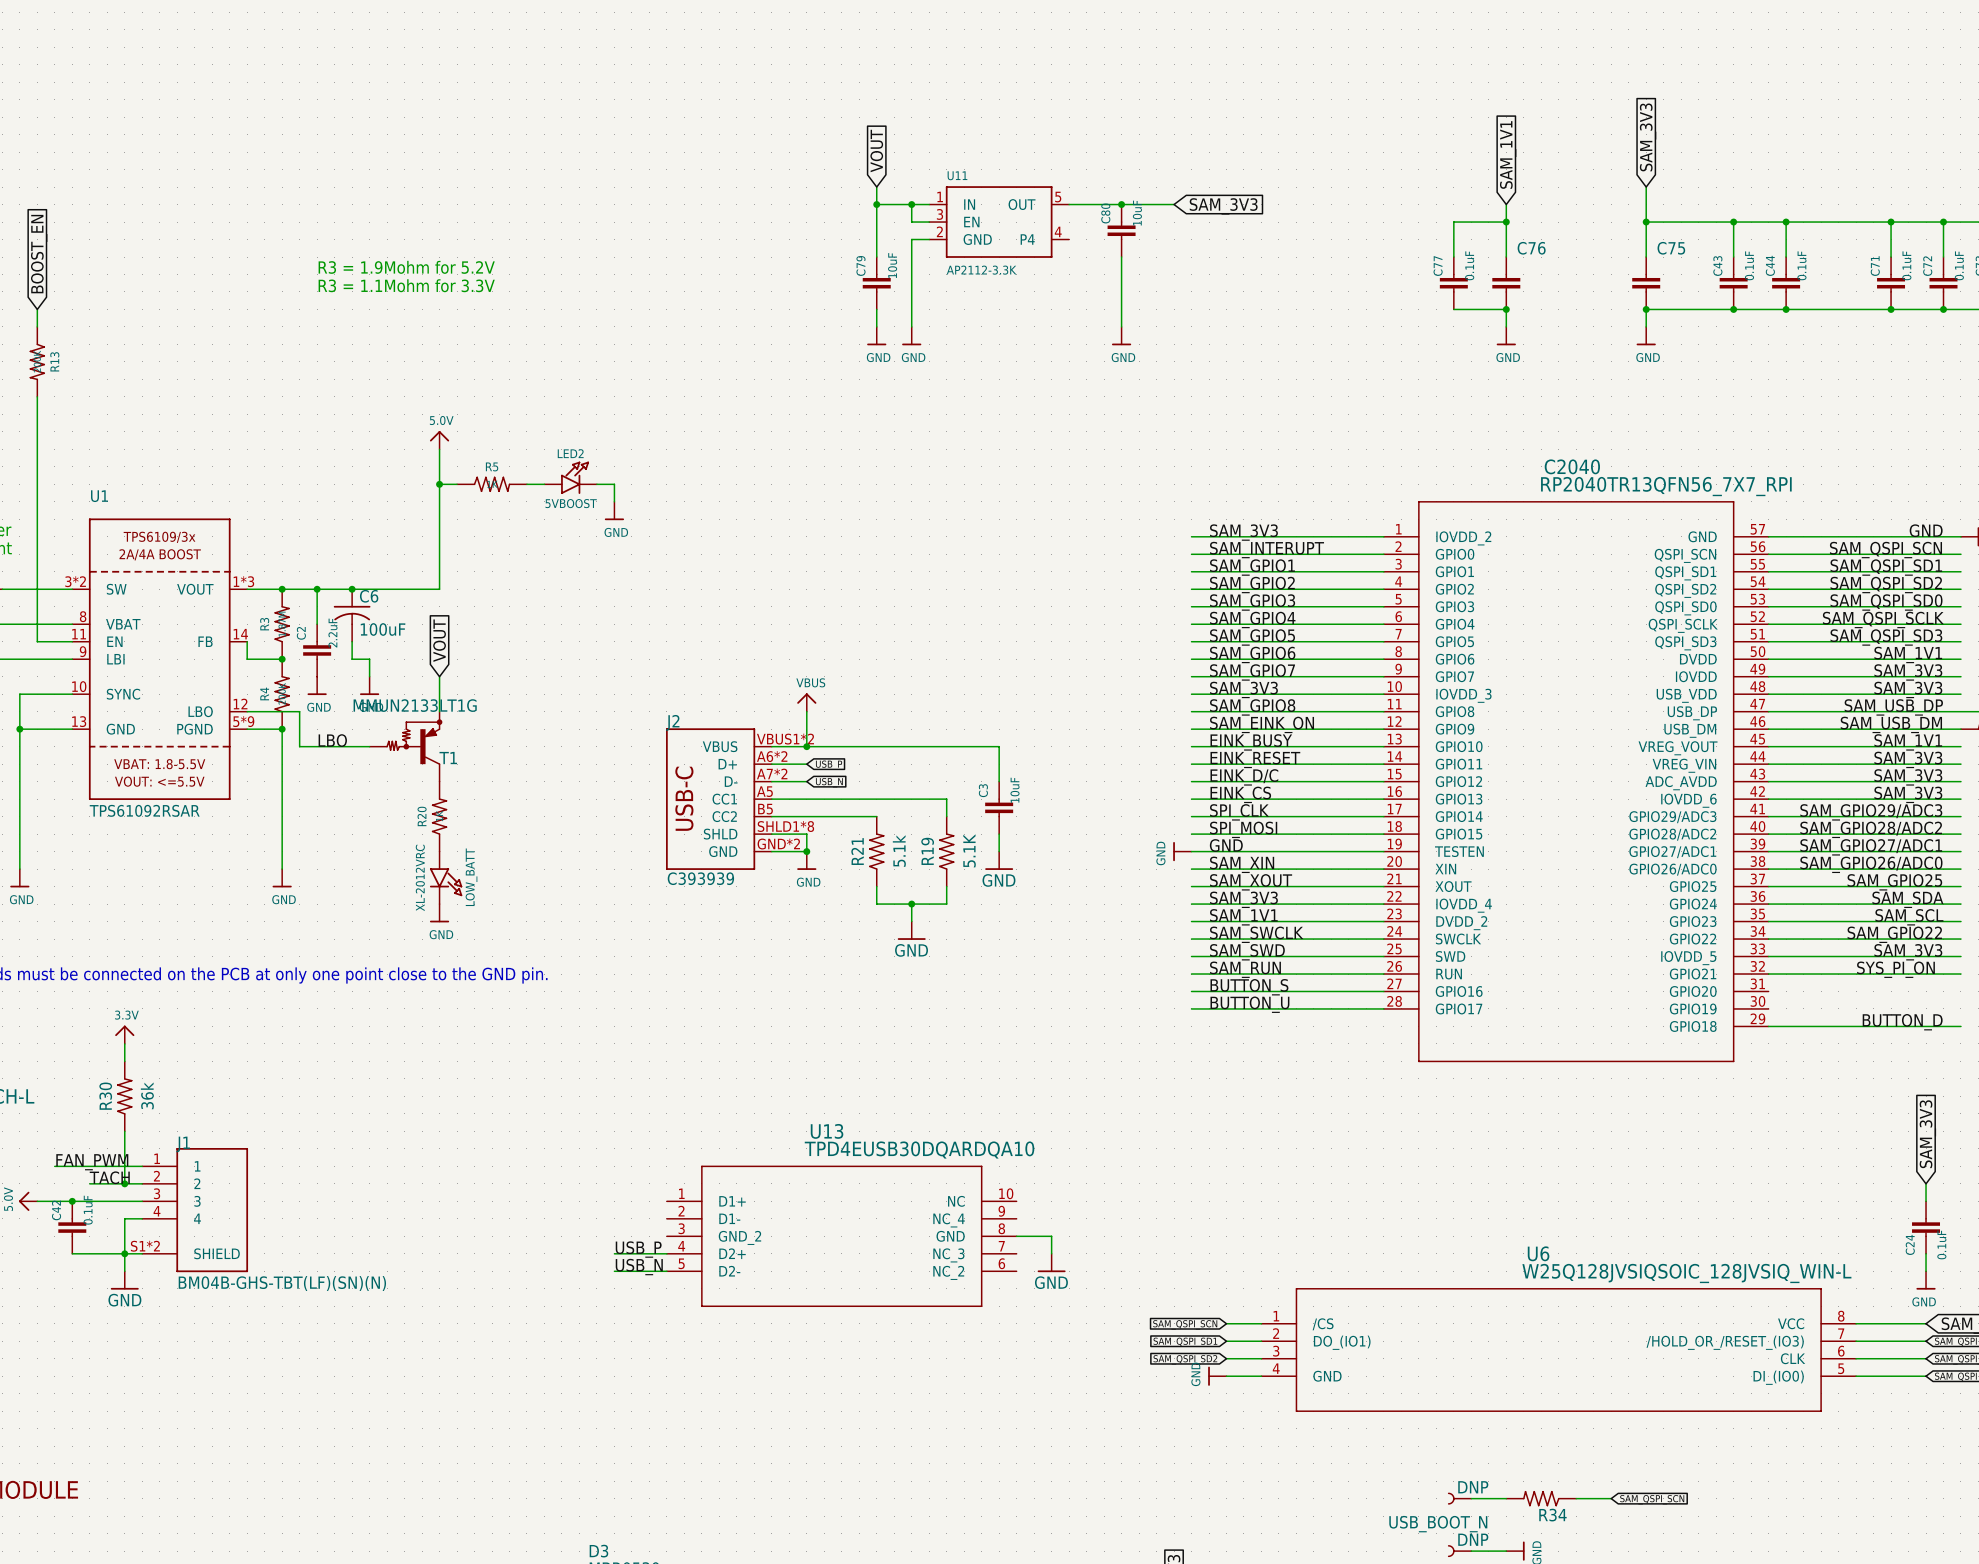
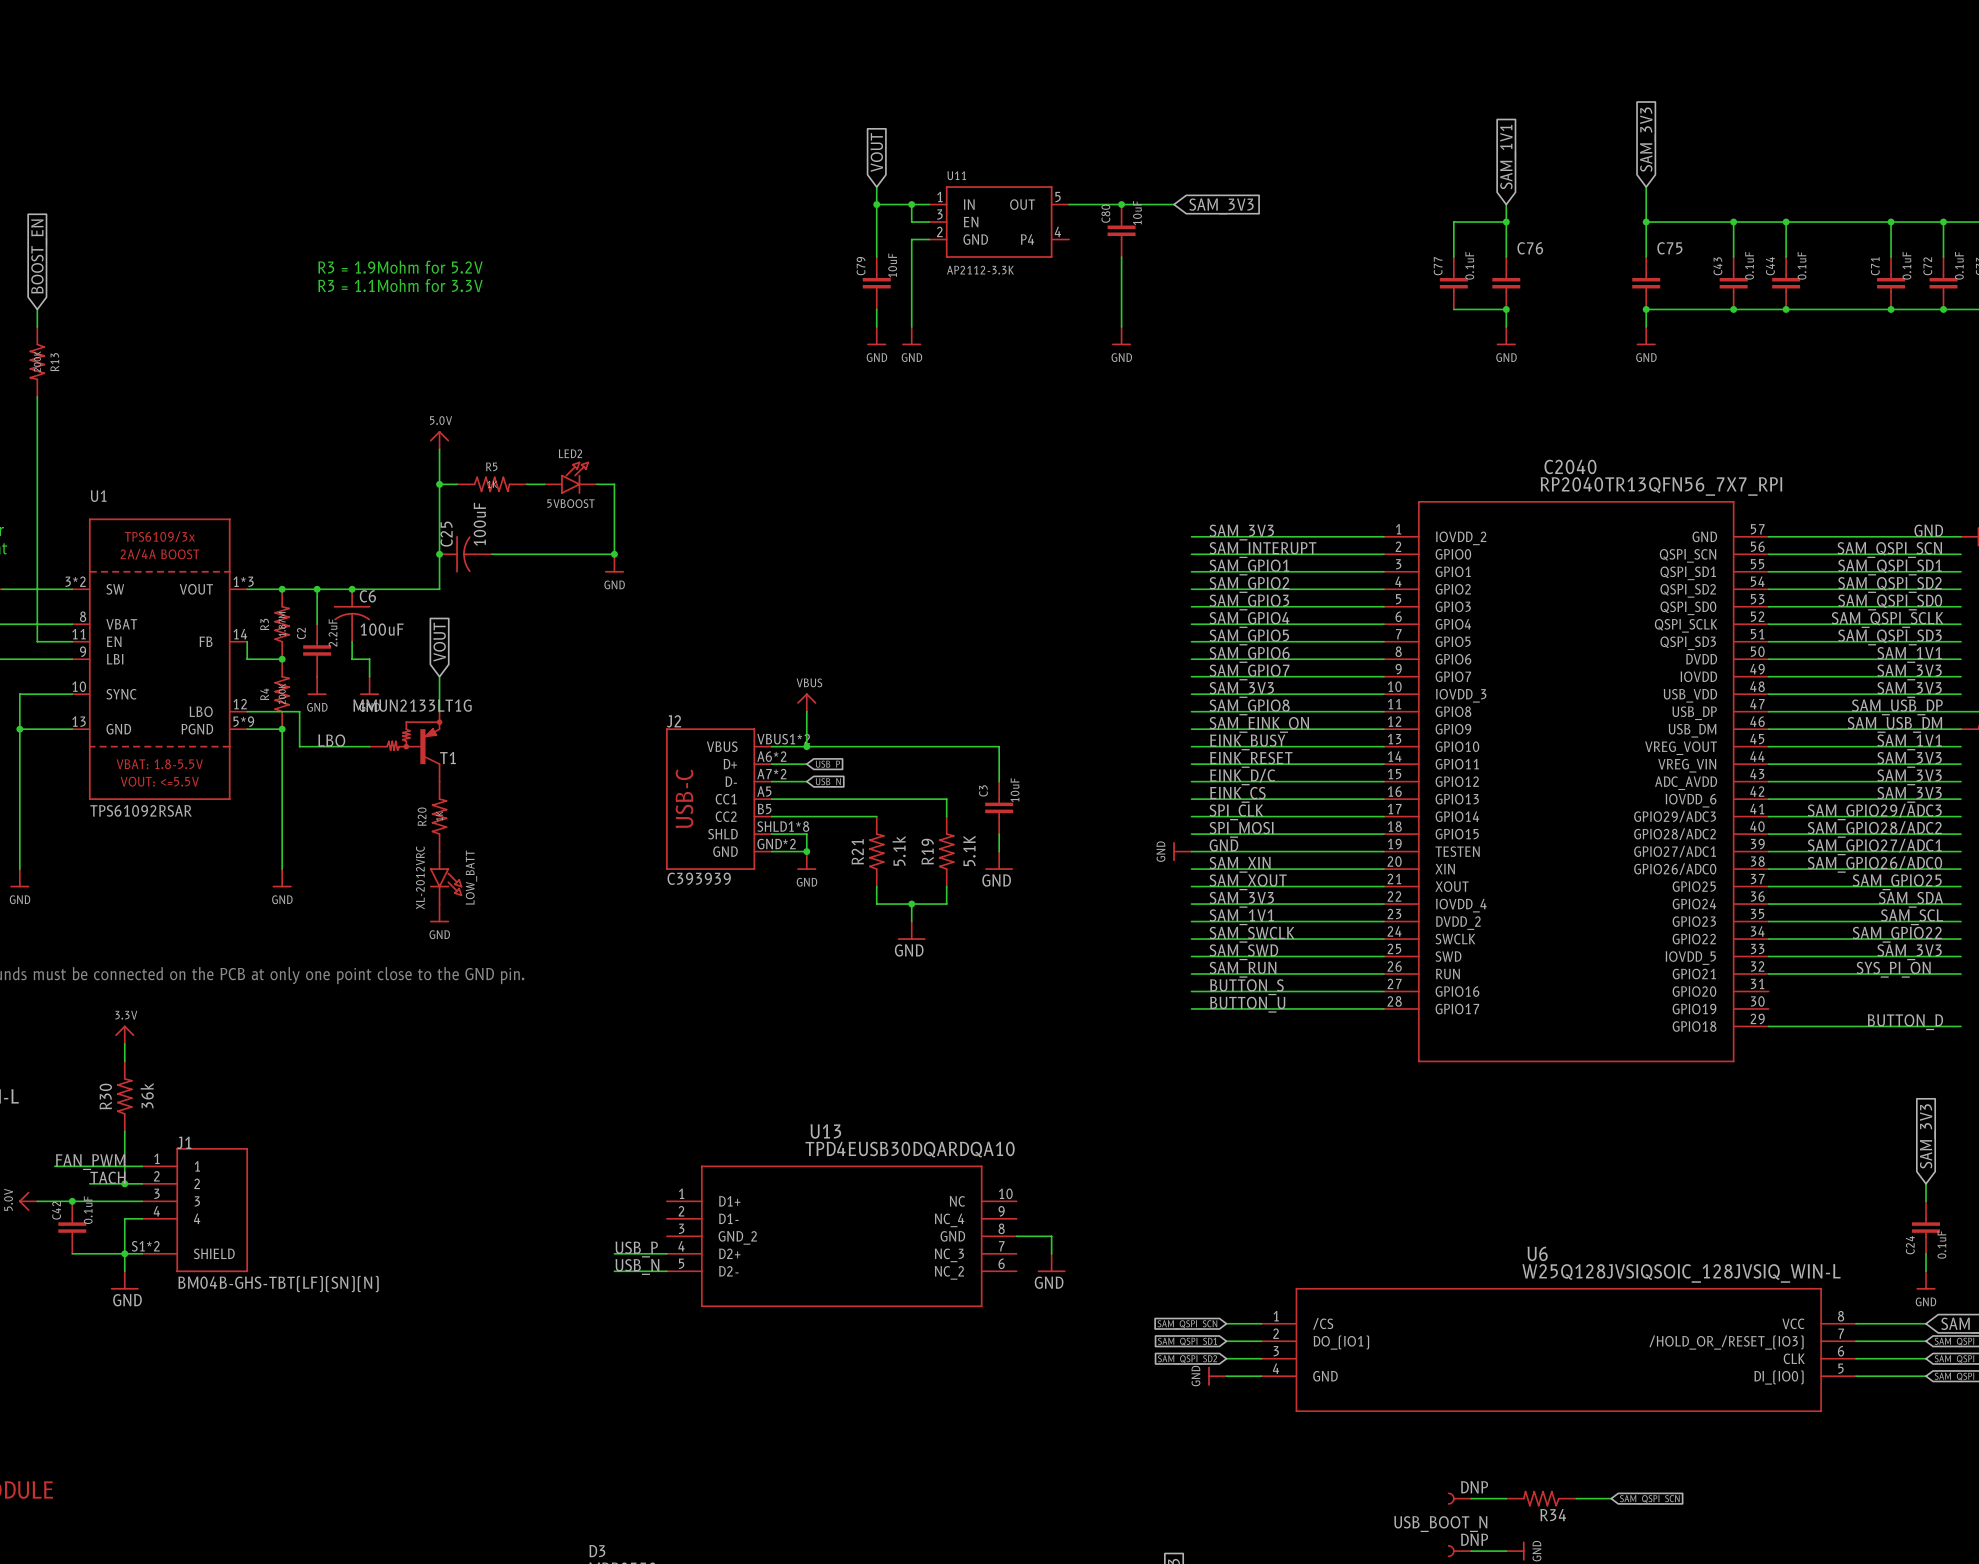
wire: none -> (614, 501) (614, 554) (492, 554)
power symbol position: GND (614, 511) -> GND (614, 563)
junction: none -> (439, 554)
C25: none -> 100uF (465, 554)
junction: none -> (614, 554)

